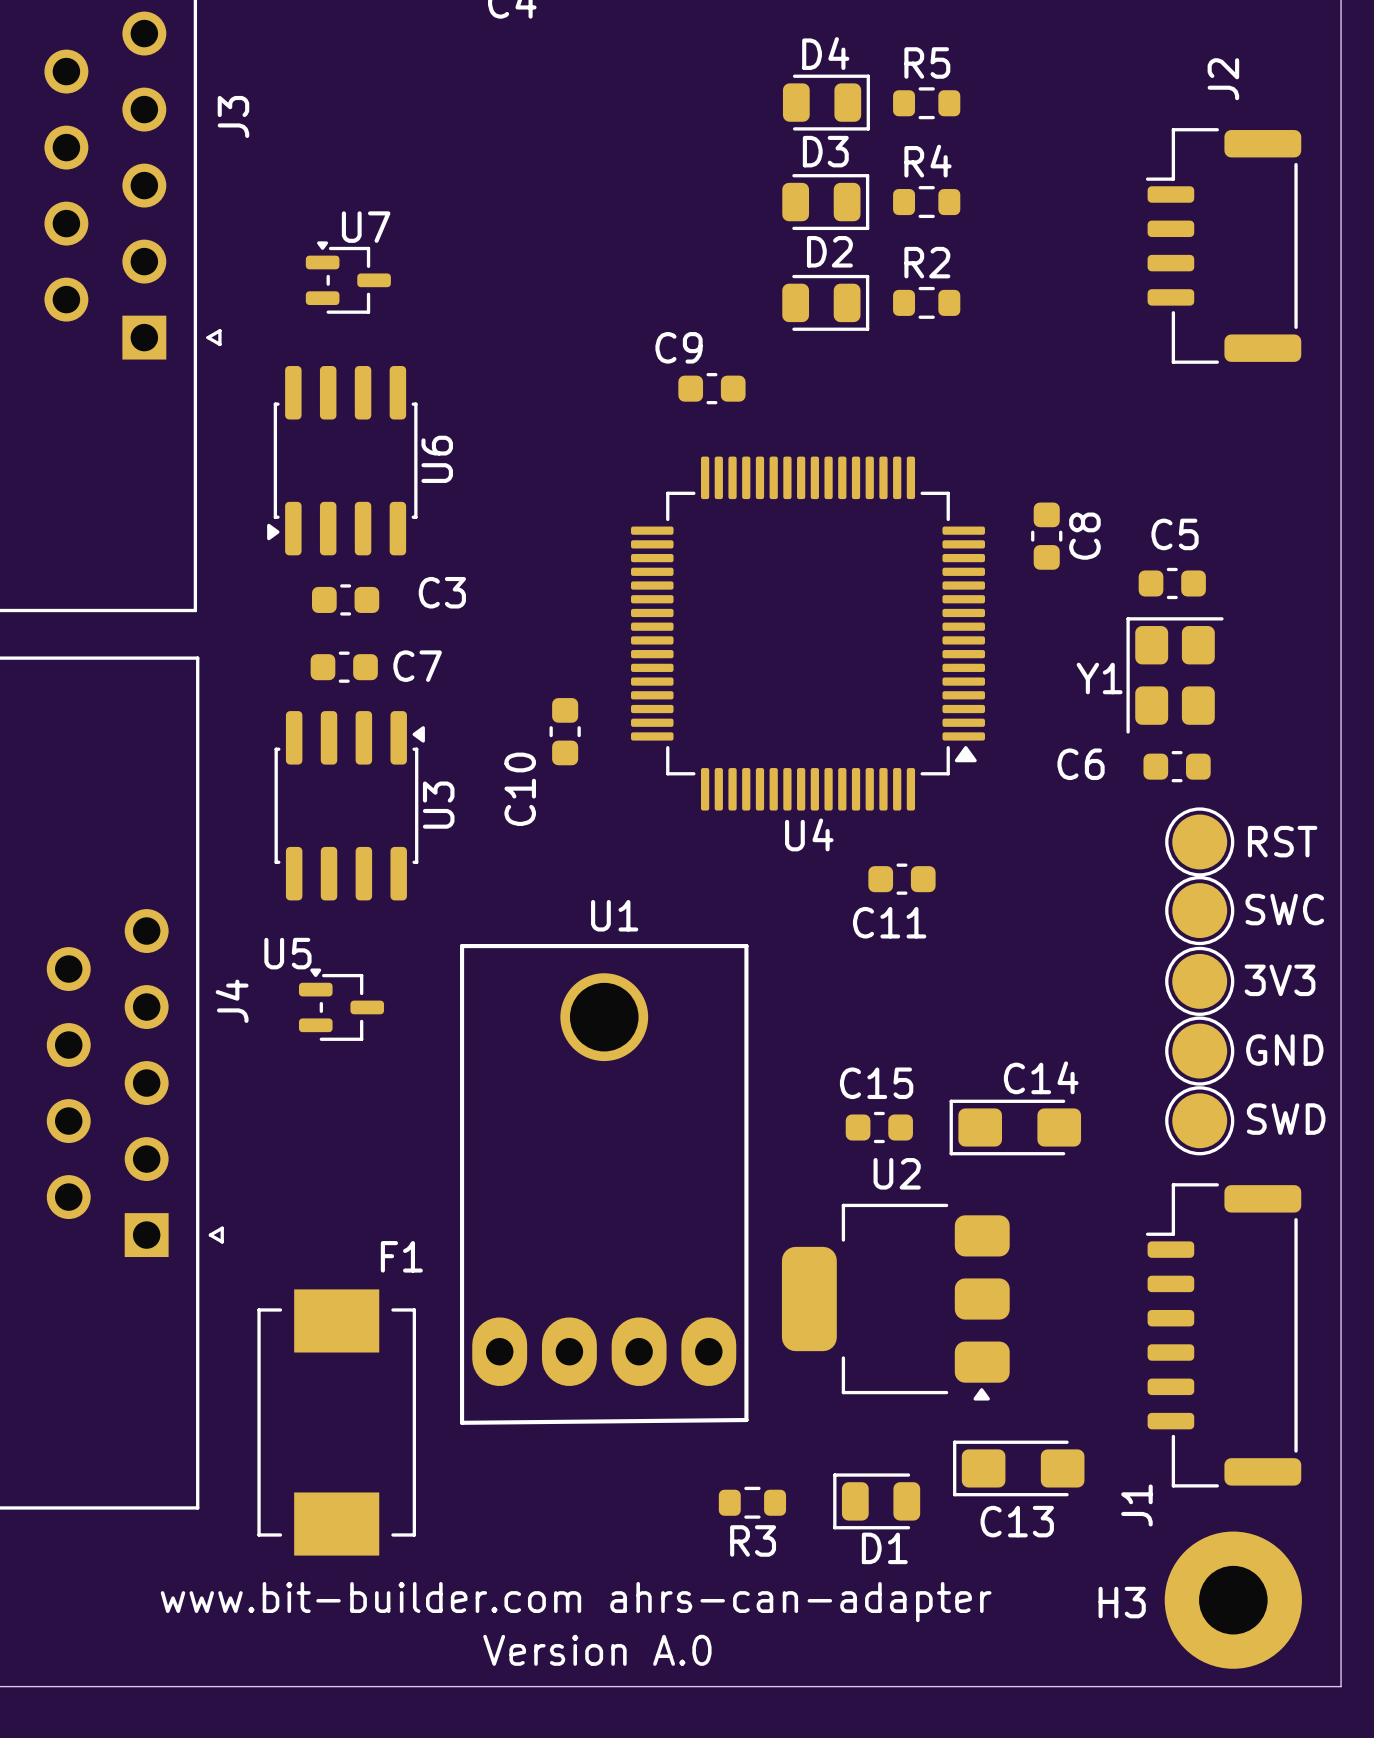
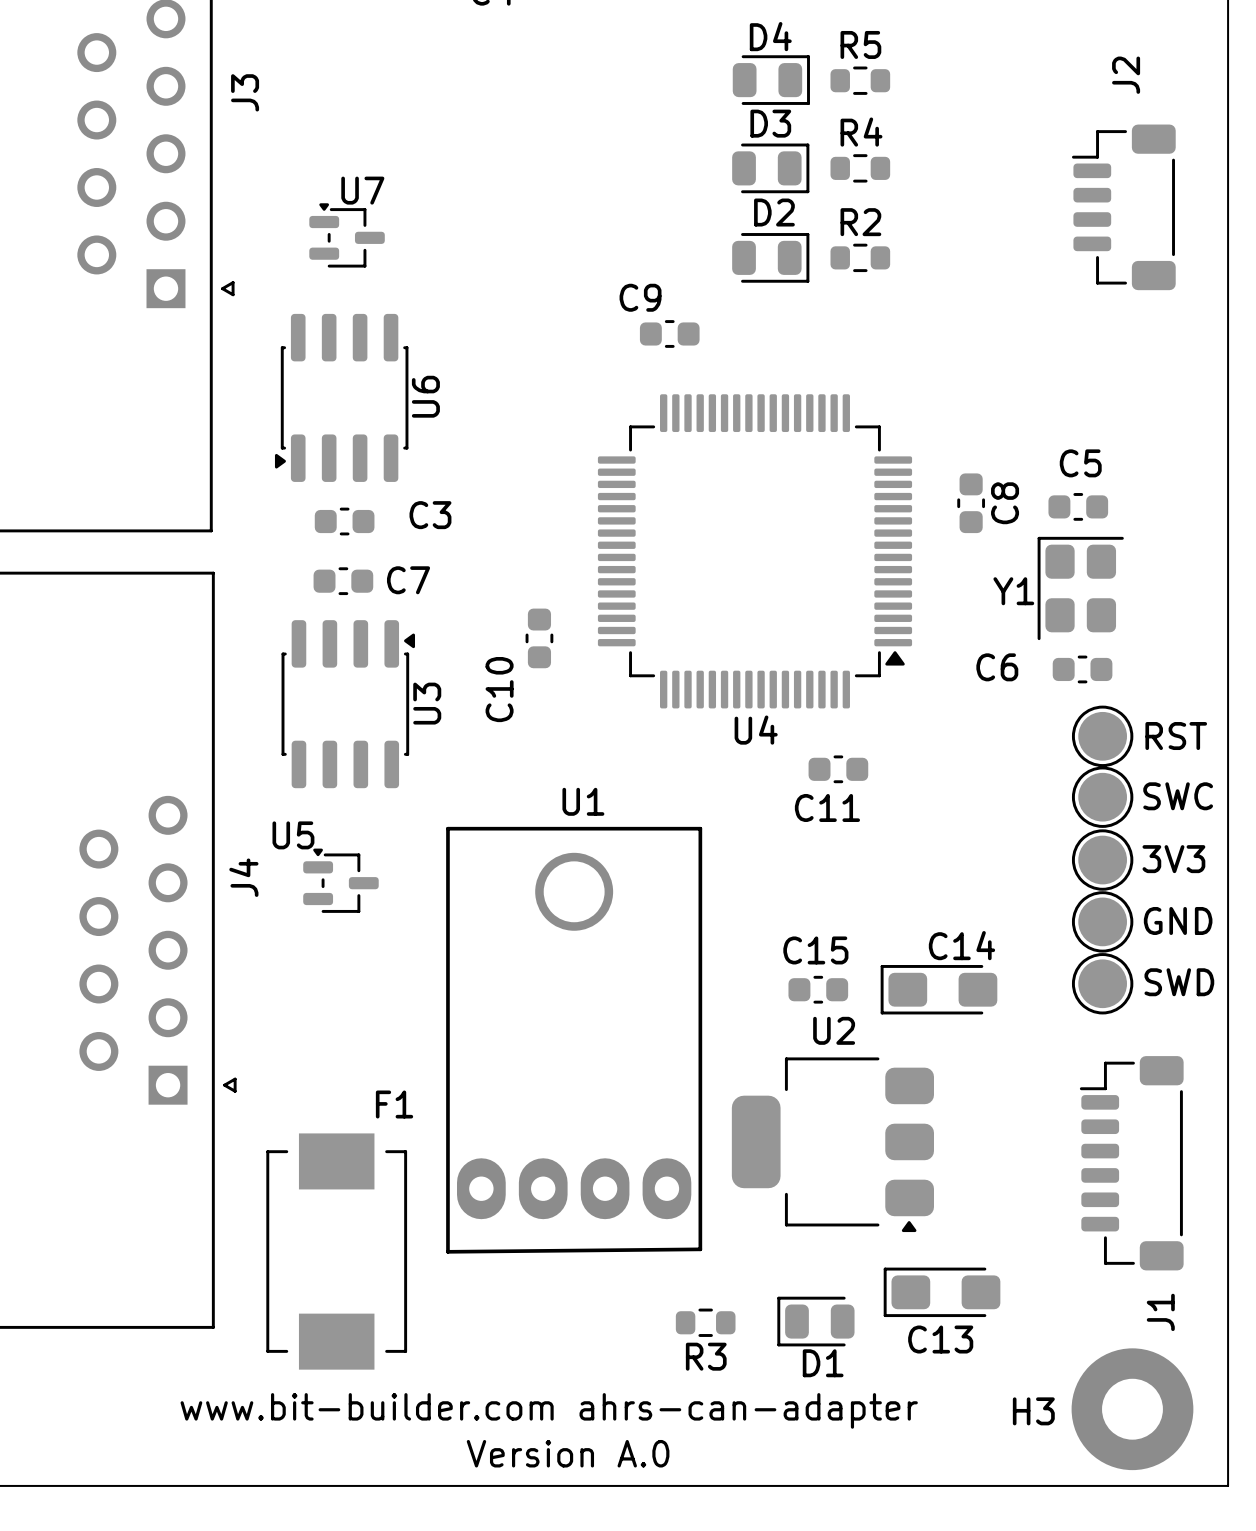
J2 footprint: [1145, 128, 1302, 364] -> [1071, 124, 1176, 291]
C8 position: (1046, 536) -> (971, 503)
J1 footprint: [1145, 1183, 1302, 1488] -> [1079, 1056, 1184, 1271]
J1 name position: J1 (1136, 1505) -> J1 (1160, 1312)

